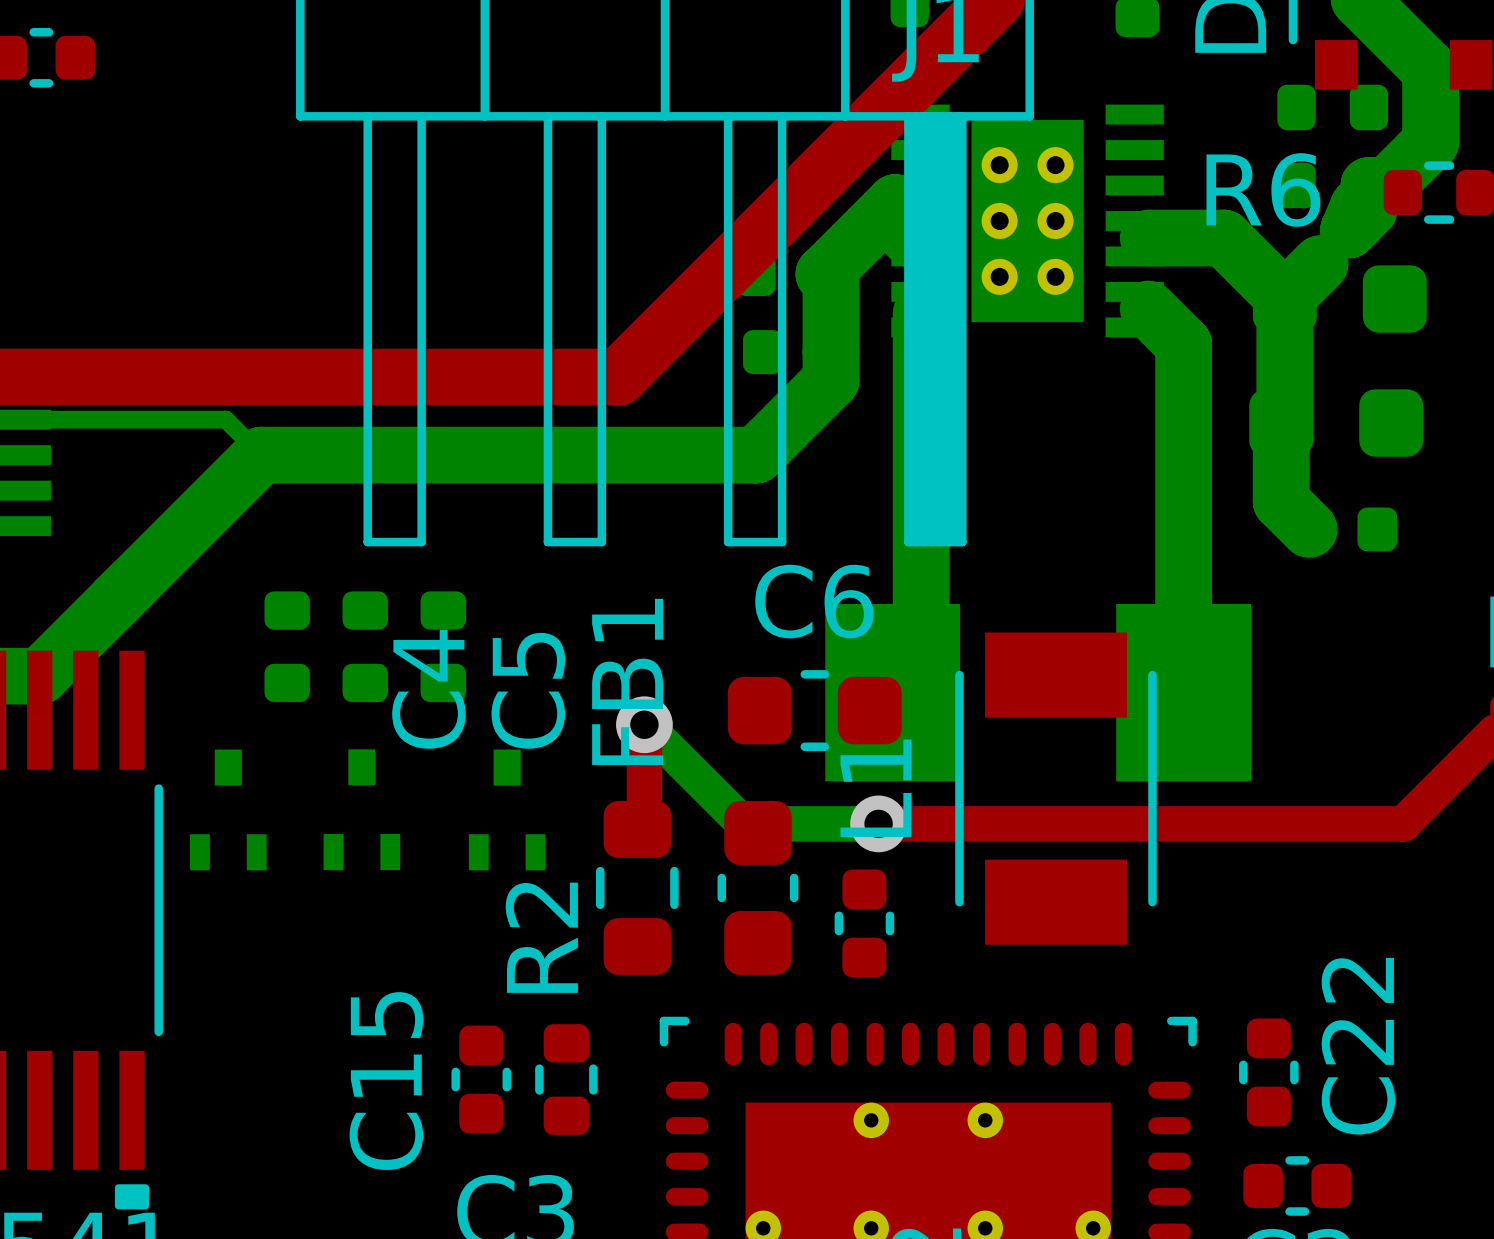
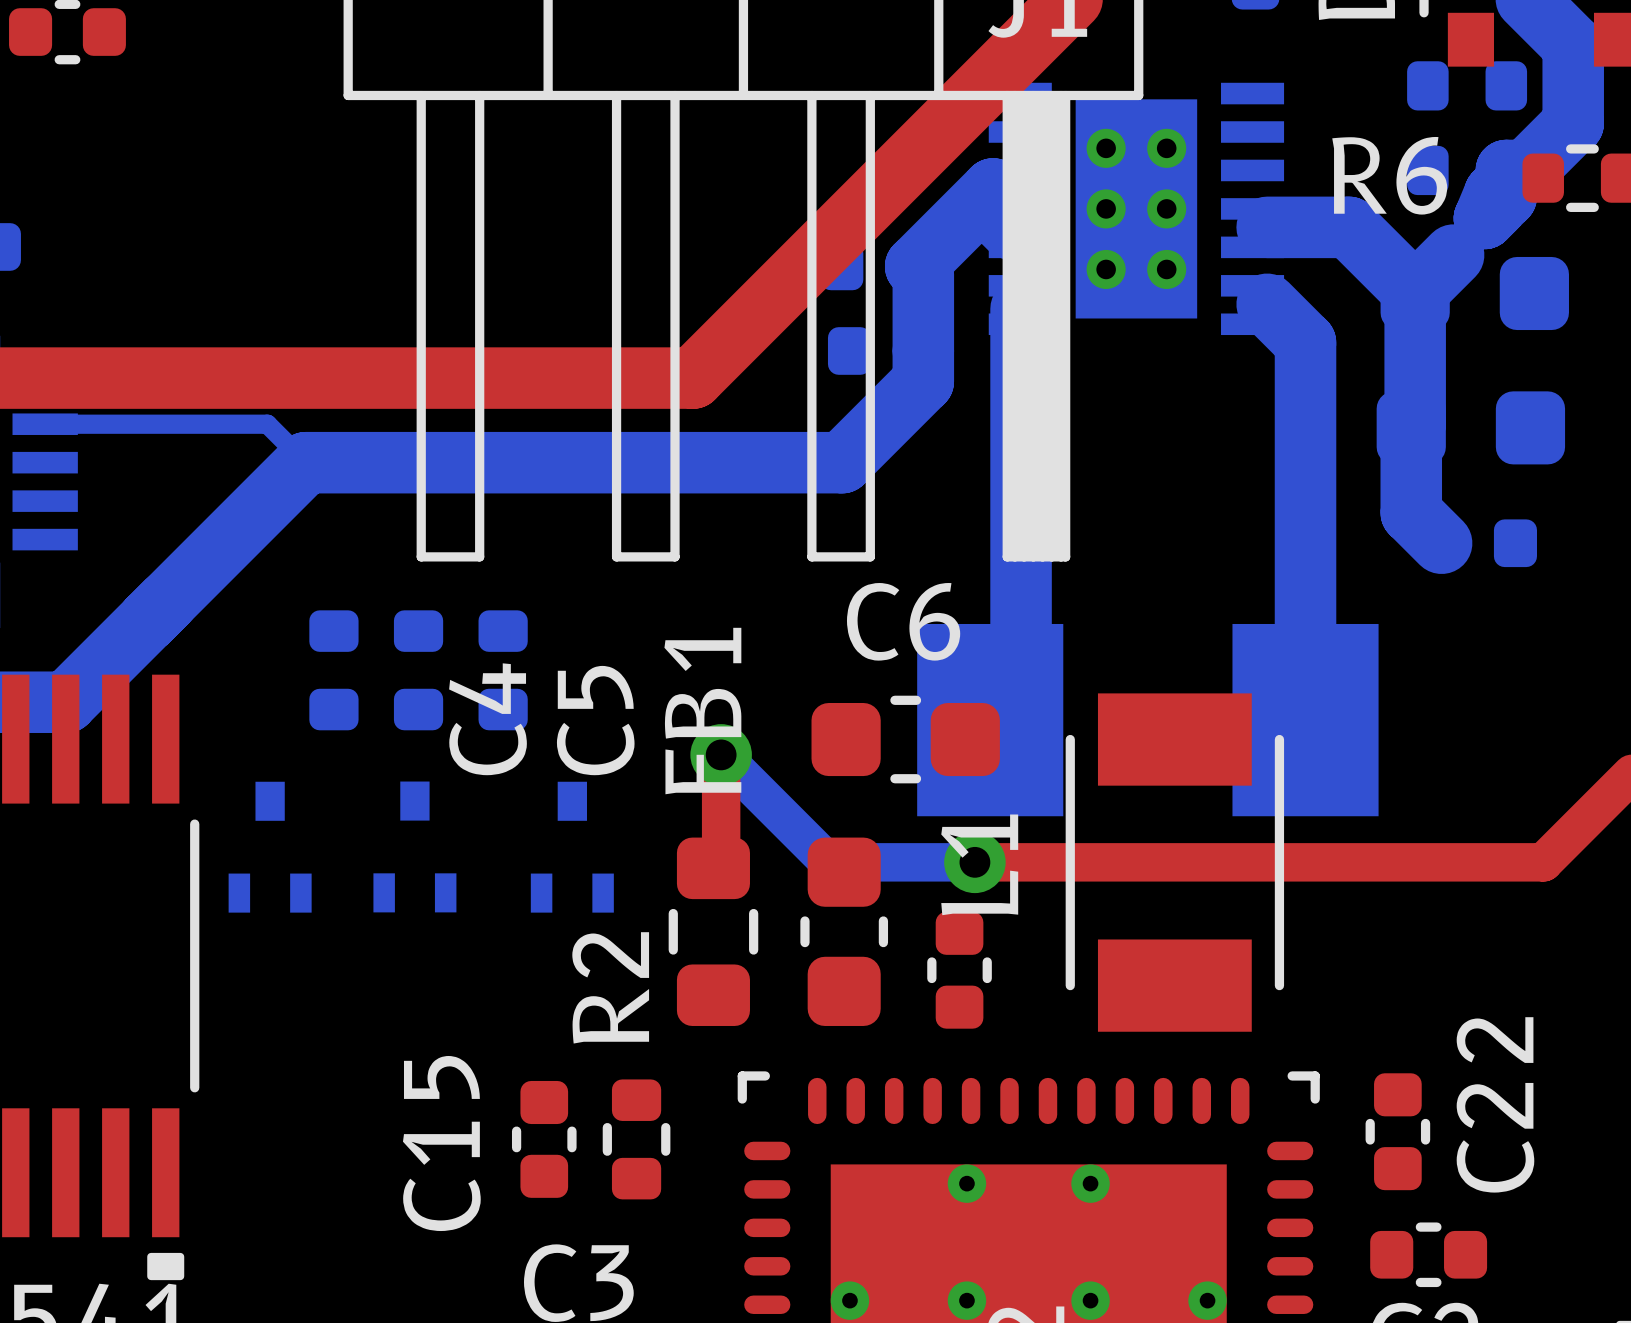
L1 position: (1055, 788) -> (1174, 862)

